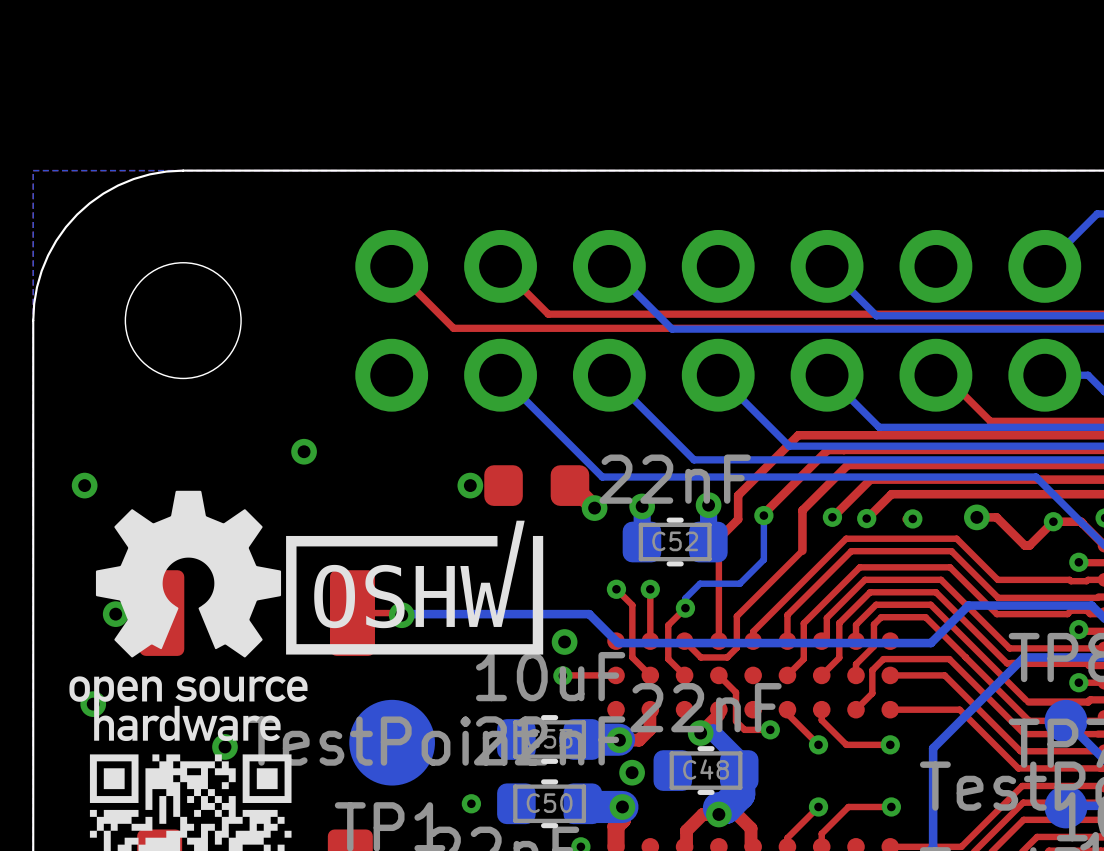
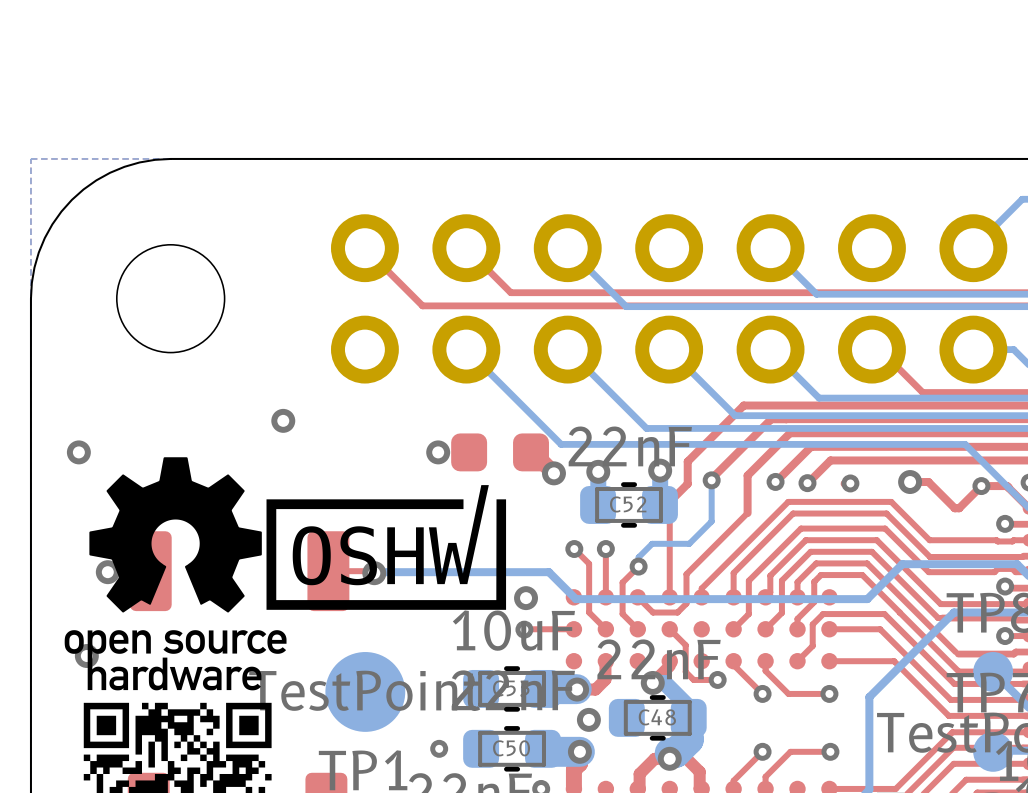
via: (225, 746) -> none

